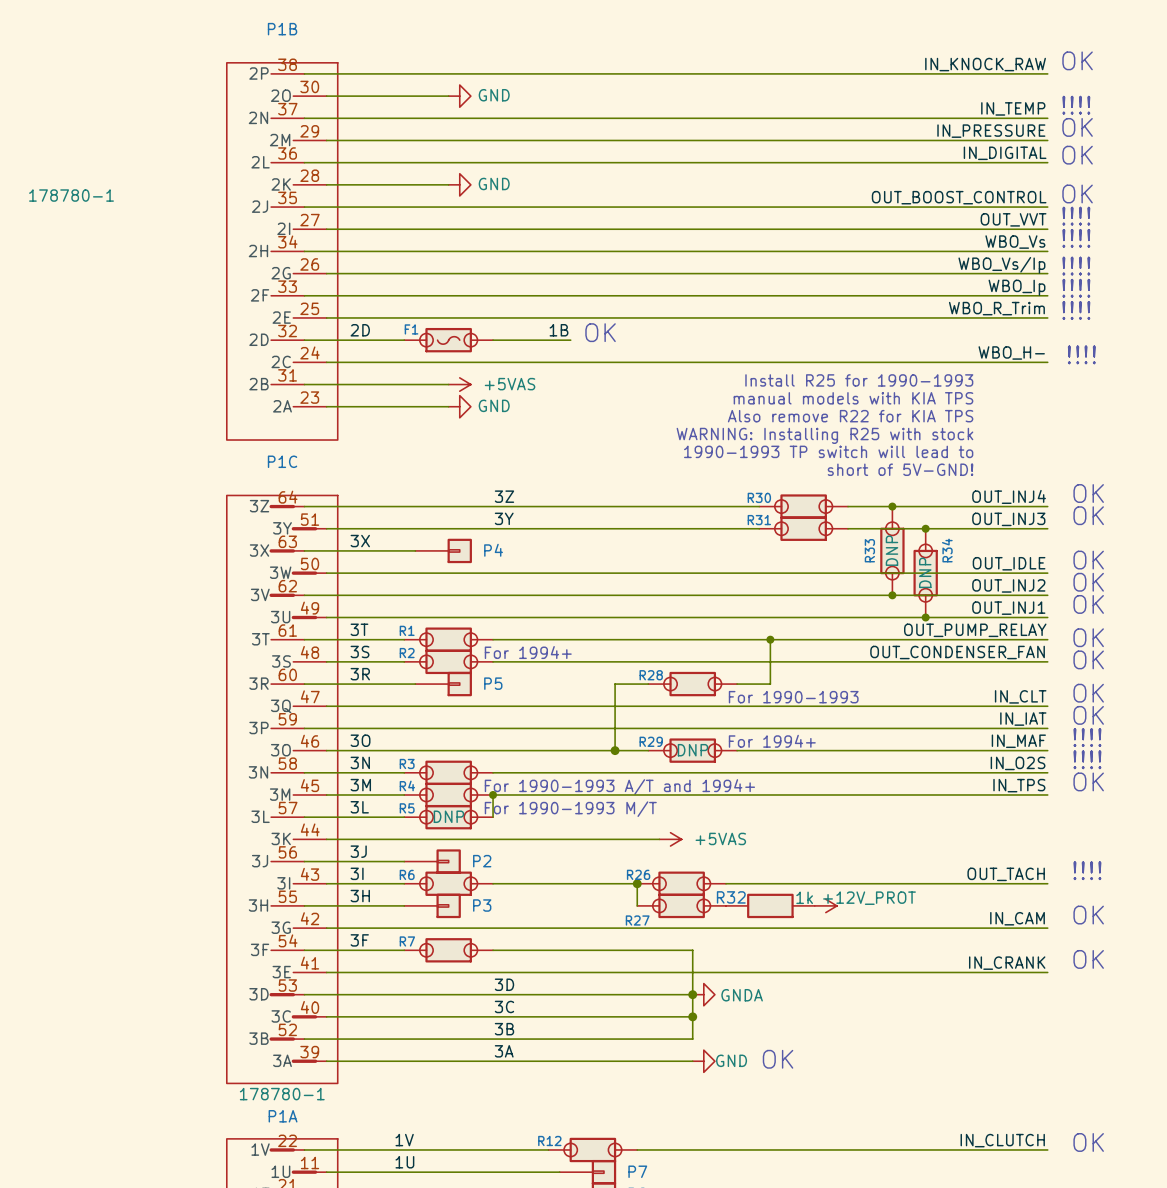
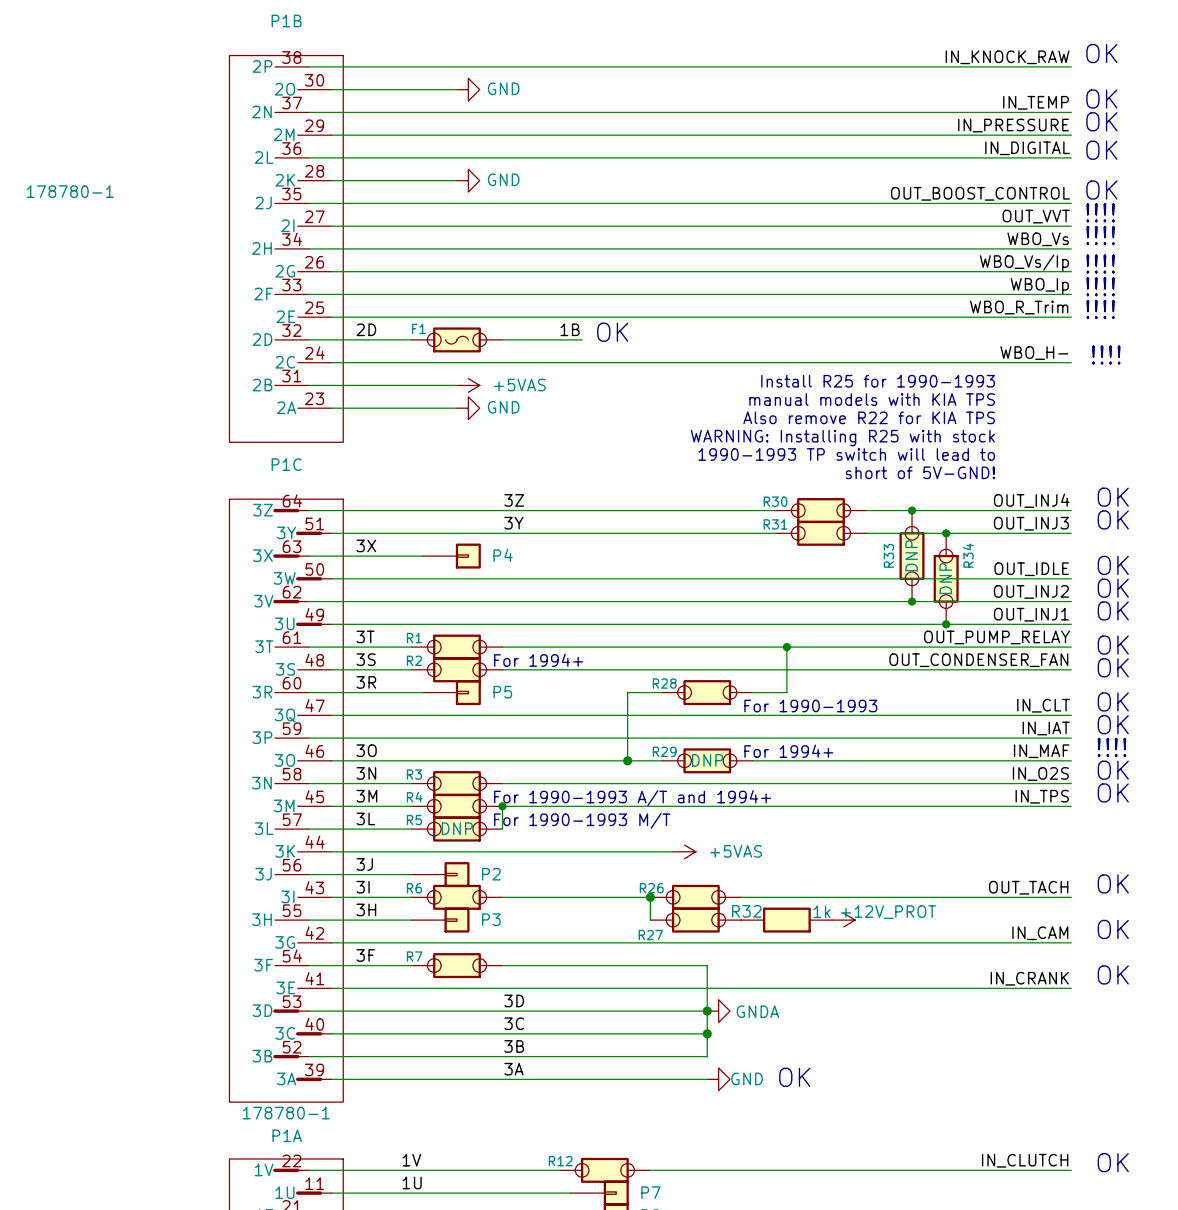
text: !!!! (1076, 105) -> OK (1101, 99)
text: !!!! (1087, 759) -> OK (1113, 770)
text: !!!! (1087, 870) -> OK (1113, 883)

